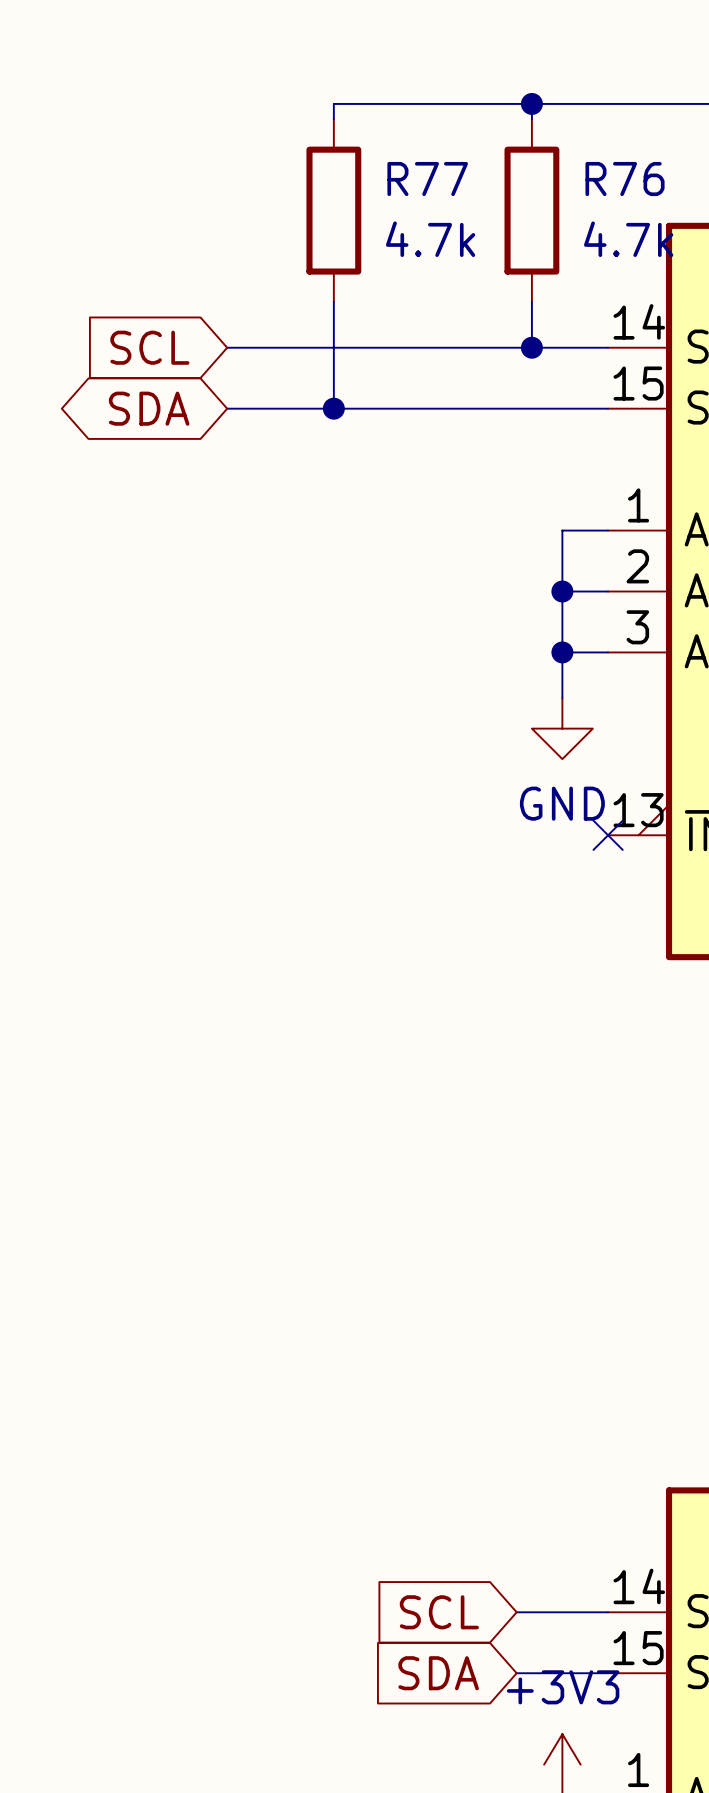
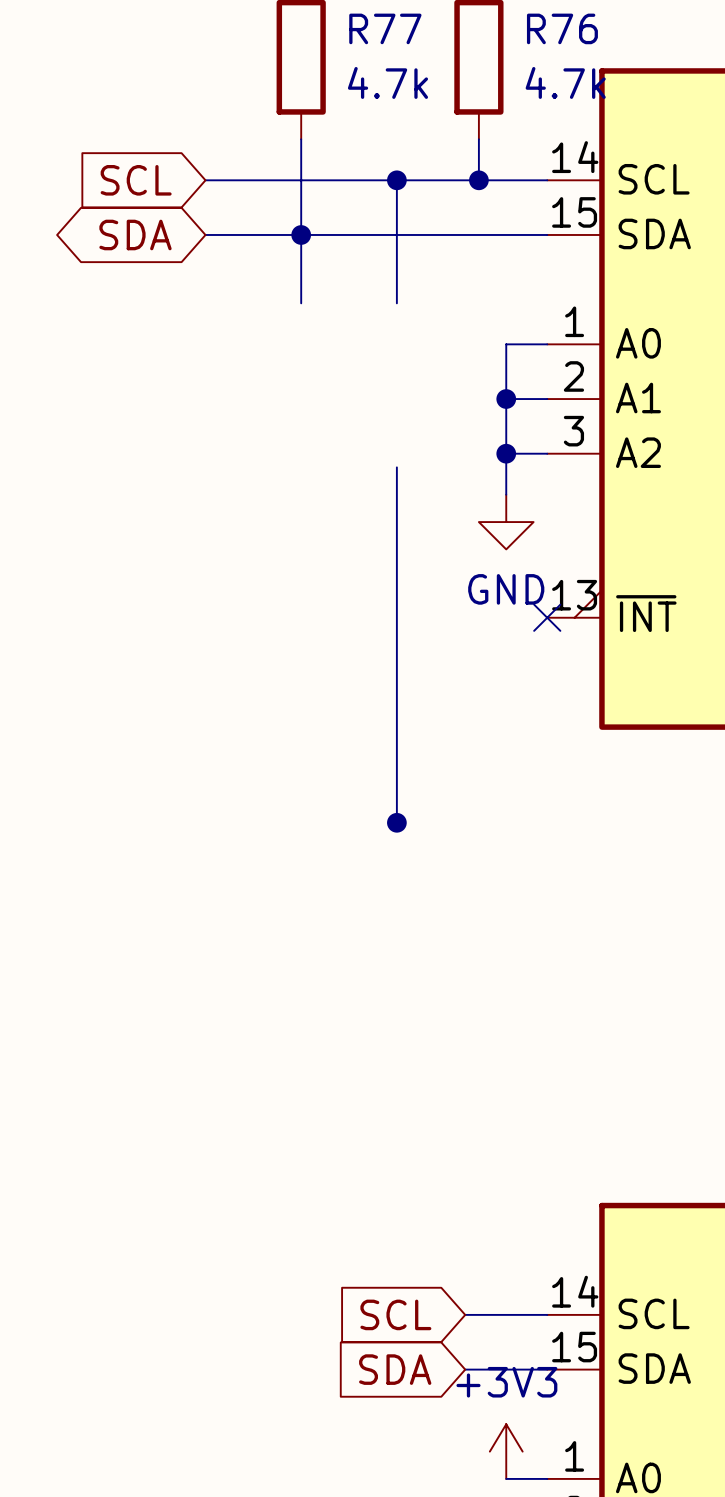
wire: none -> (396, 180) (396, 303)
junction: none -> (396, 180)
wire: none -> (301, 234) (301, 303)
wire: none -> (396, 467) (396, 822)
junction: none -> (396, 822)

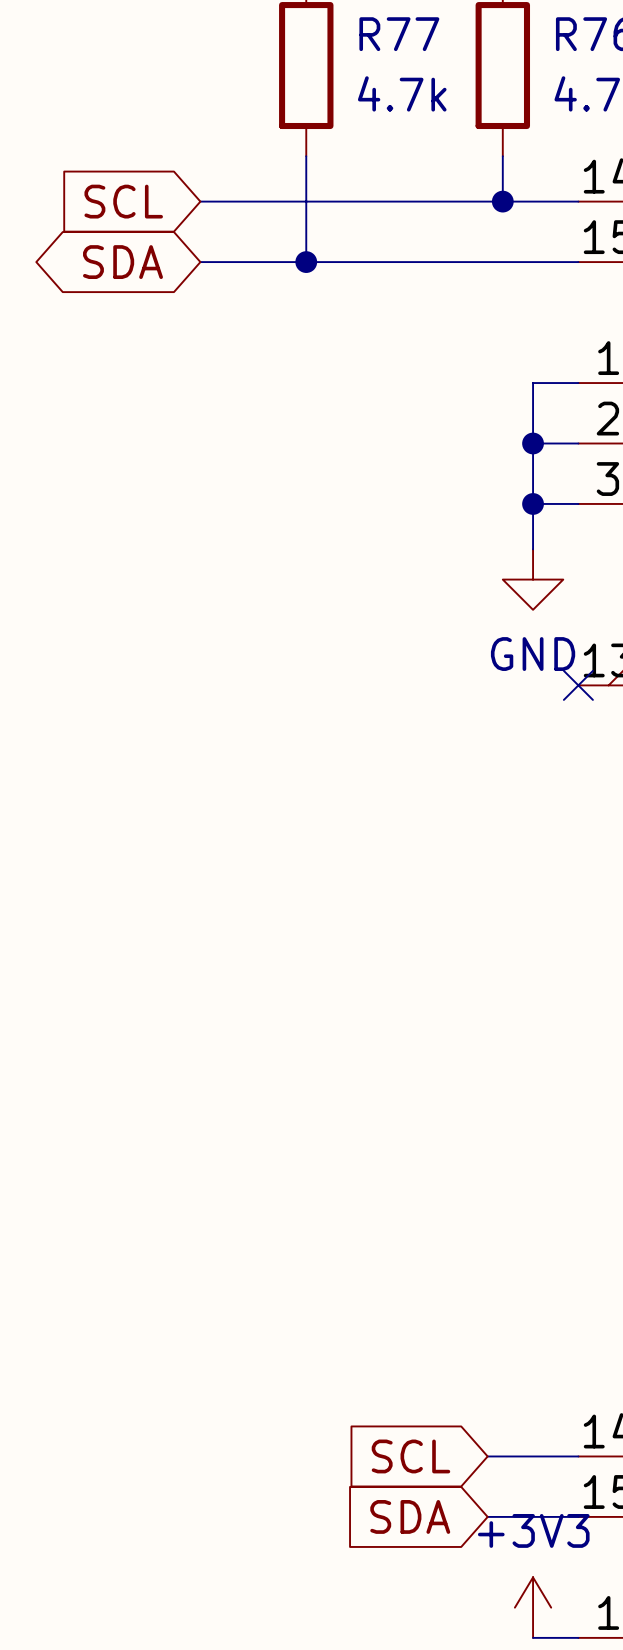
wire: (396, 180) (396, 303) -> none
junction: (396, 180) -> none
wire: (301, 234) (301, 303) -> none
wire: (396, 467) (396, 822) -> none
junction: (396, 822) -> none

